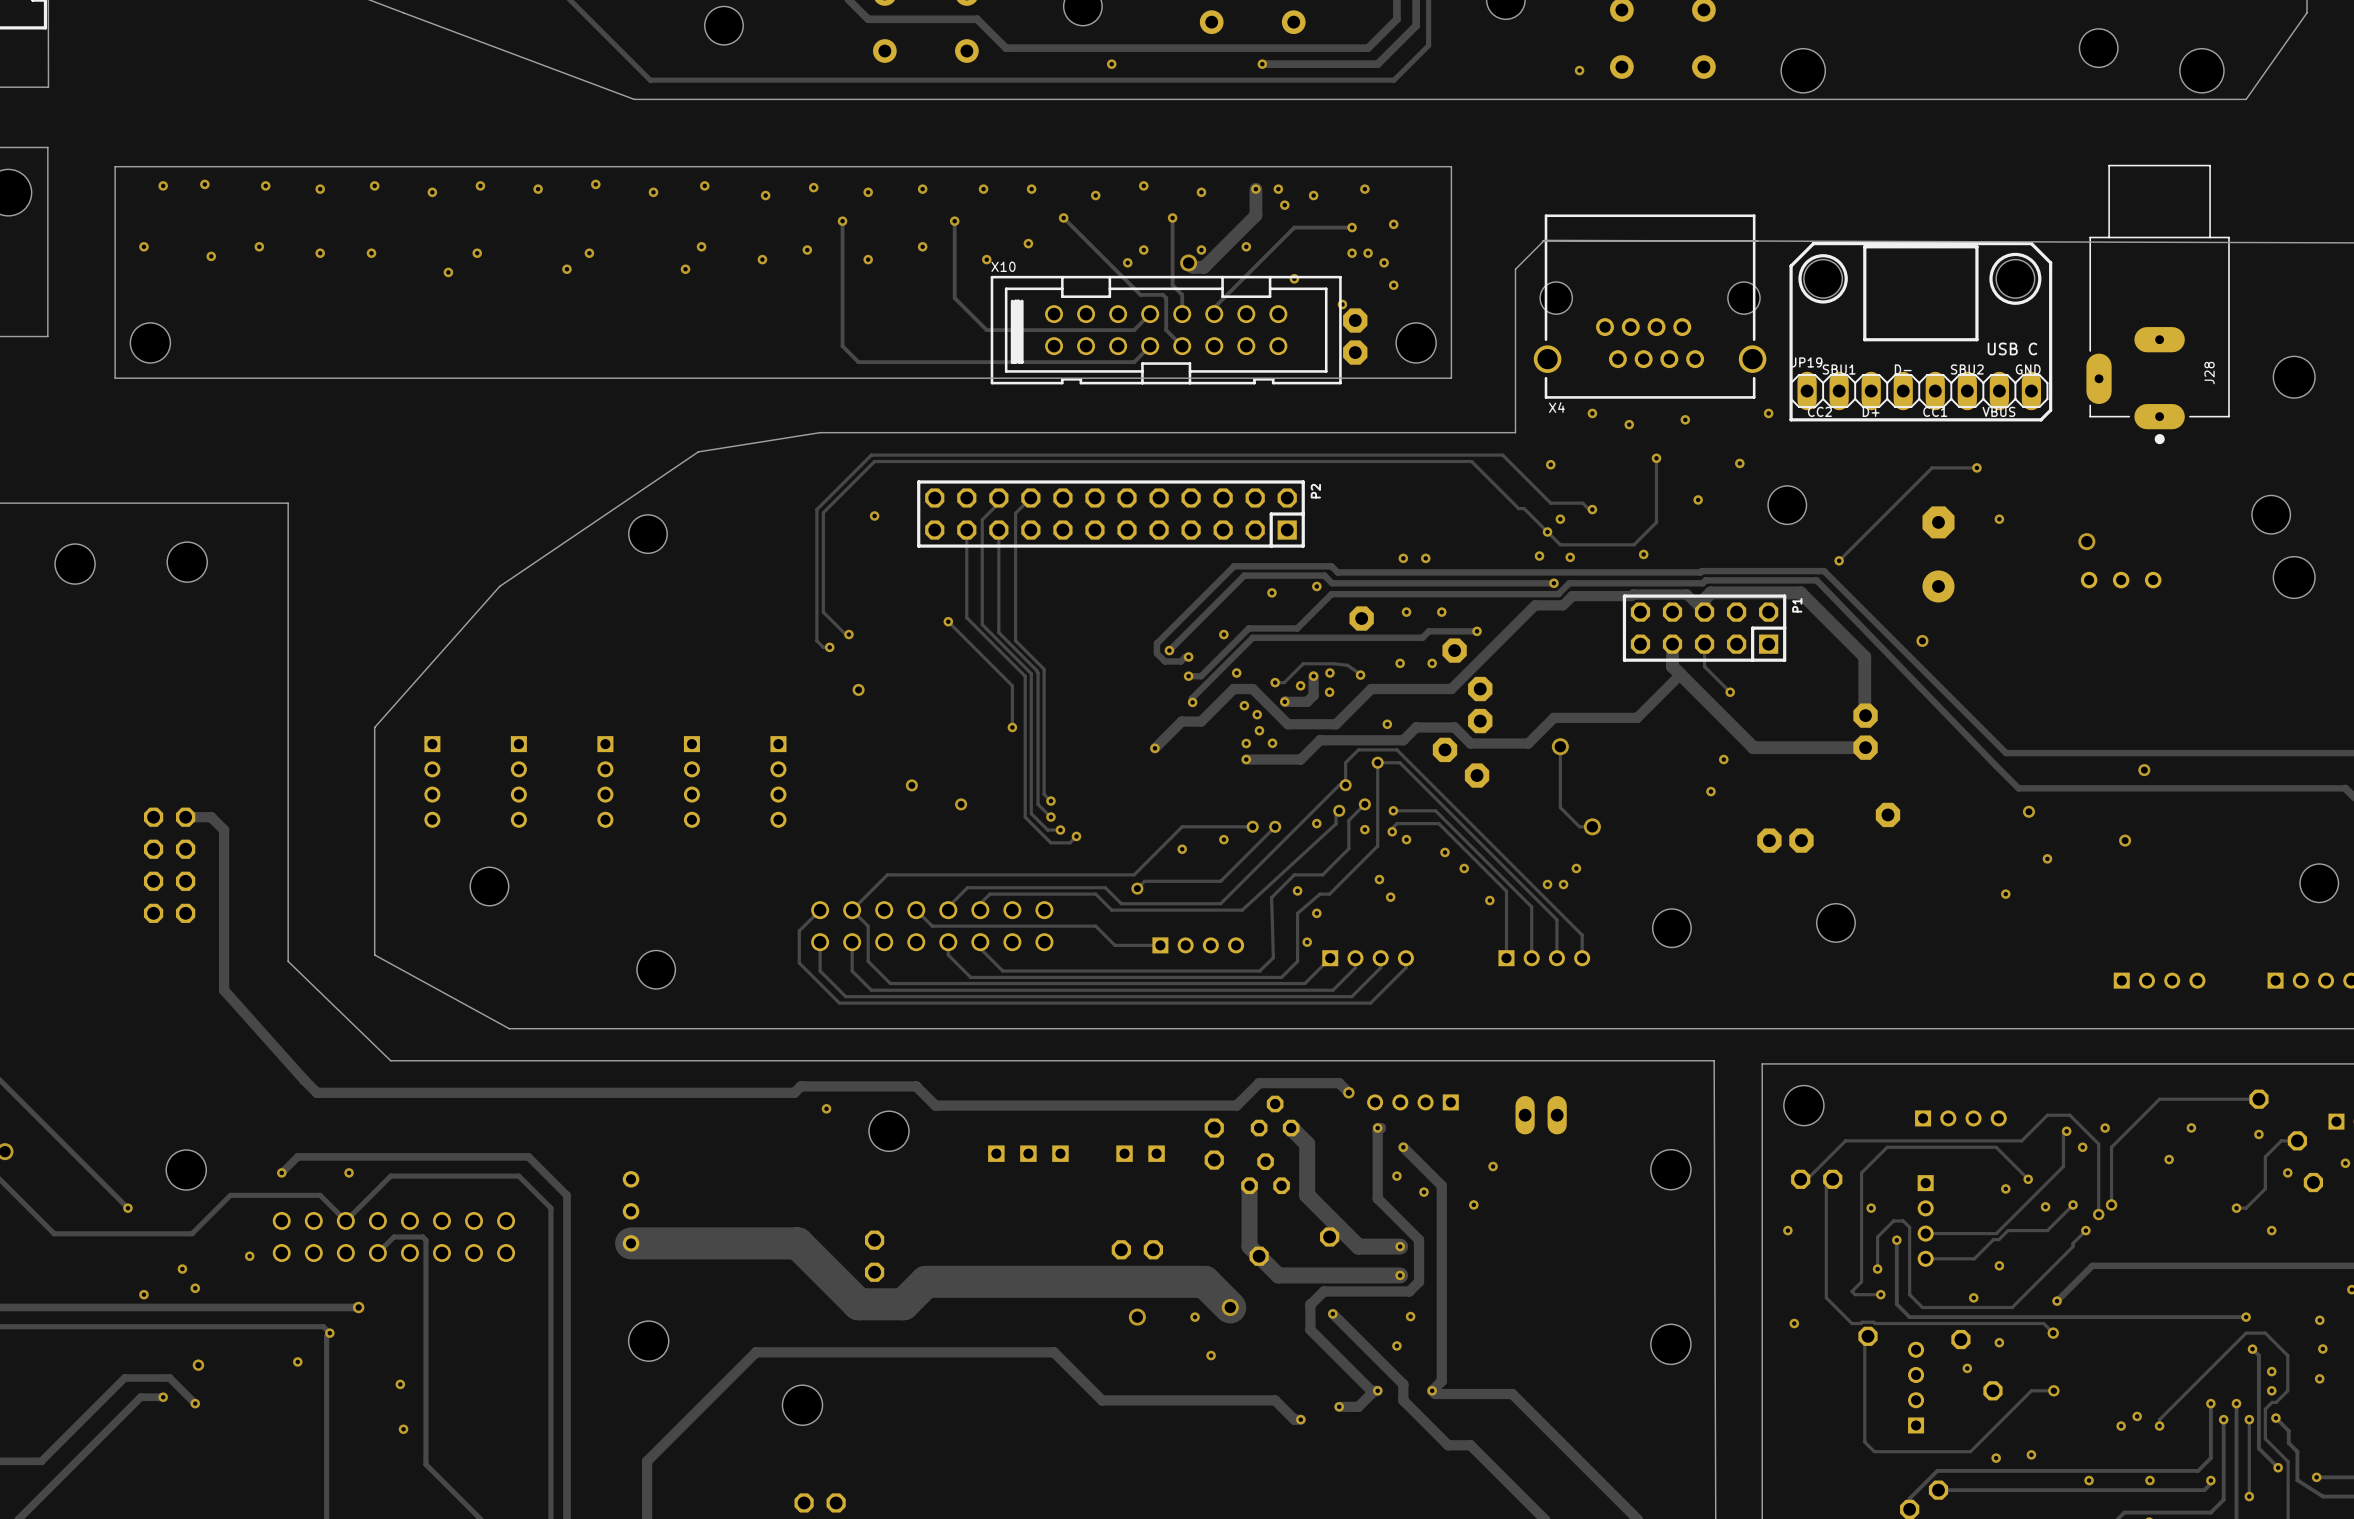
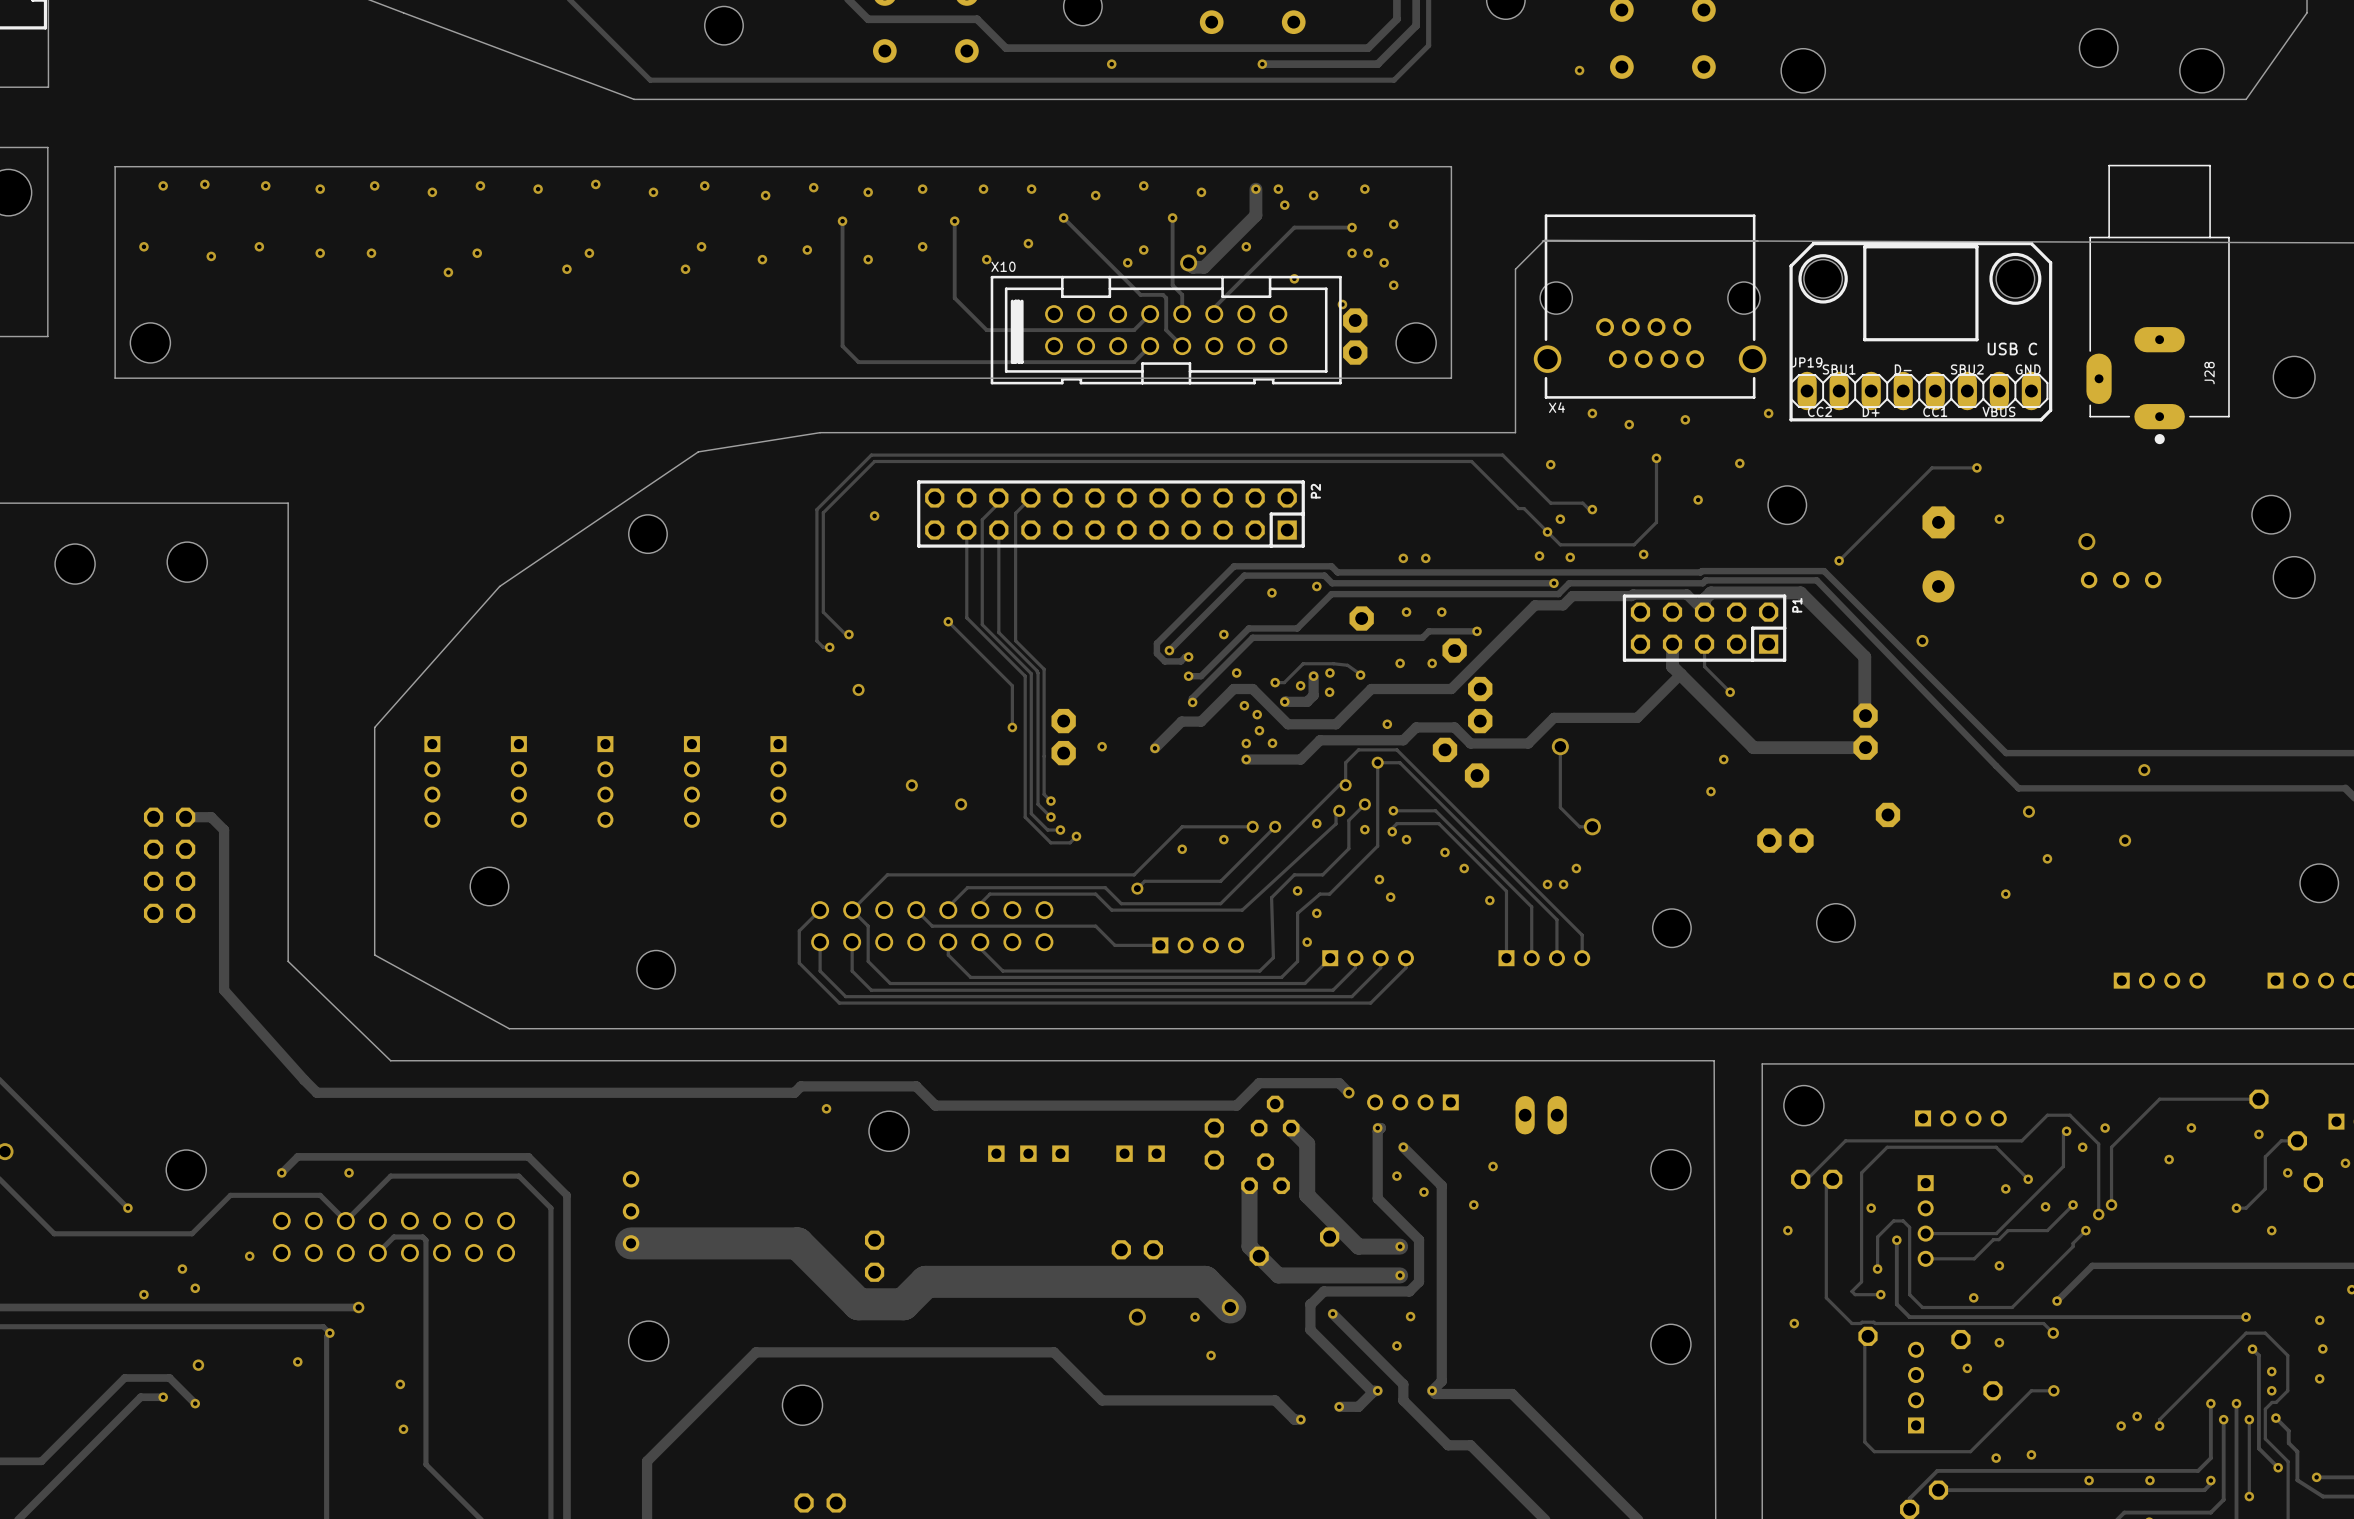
part: none -> (1063, 721)
via: none -> (1102, 746)
part: none -> (1063, 753)

